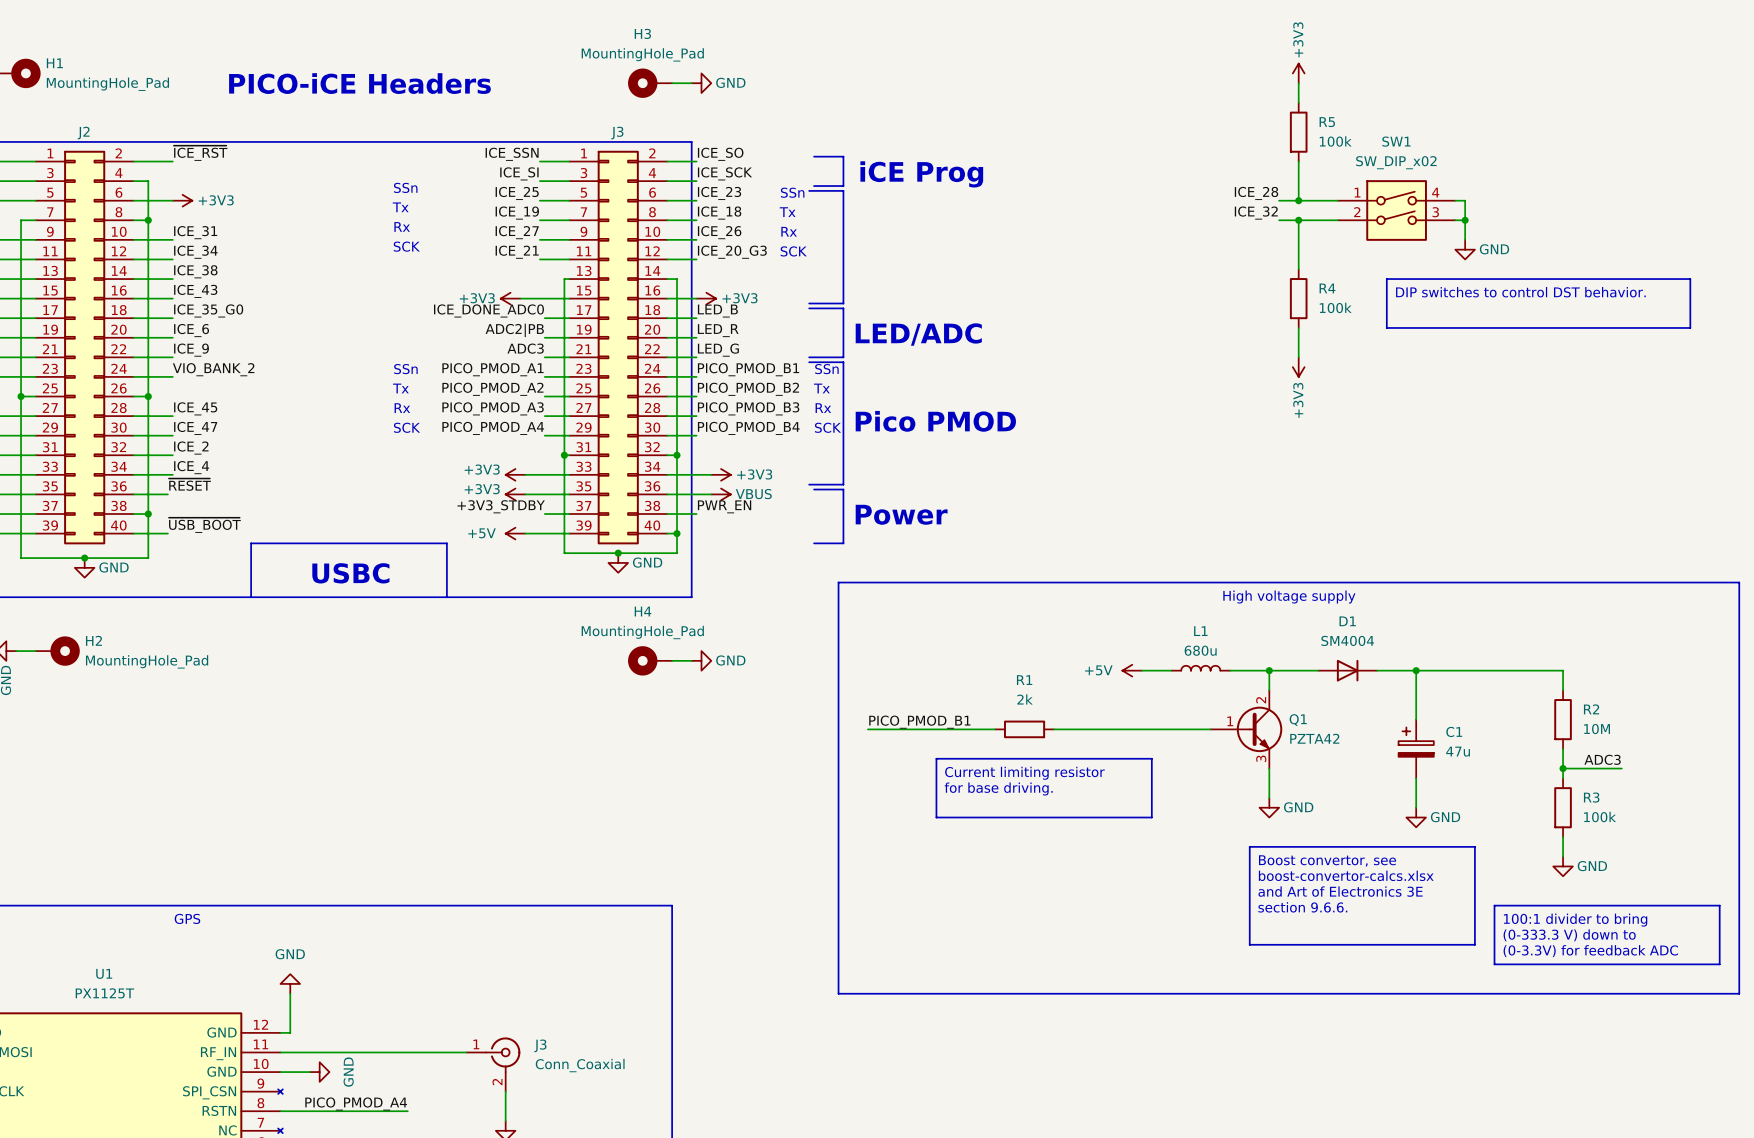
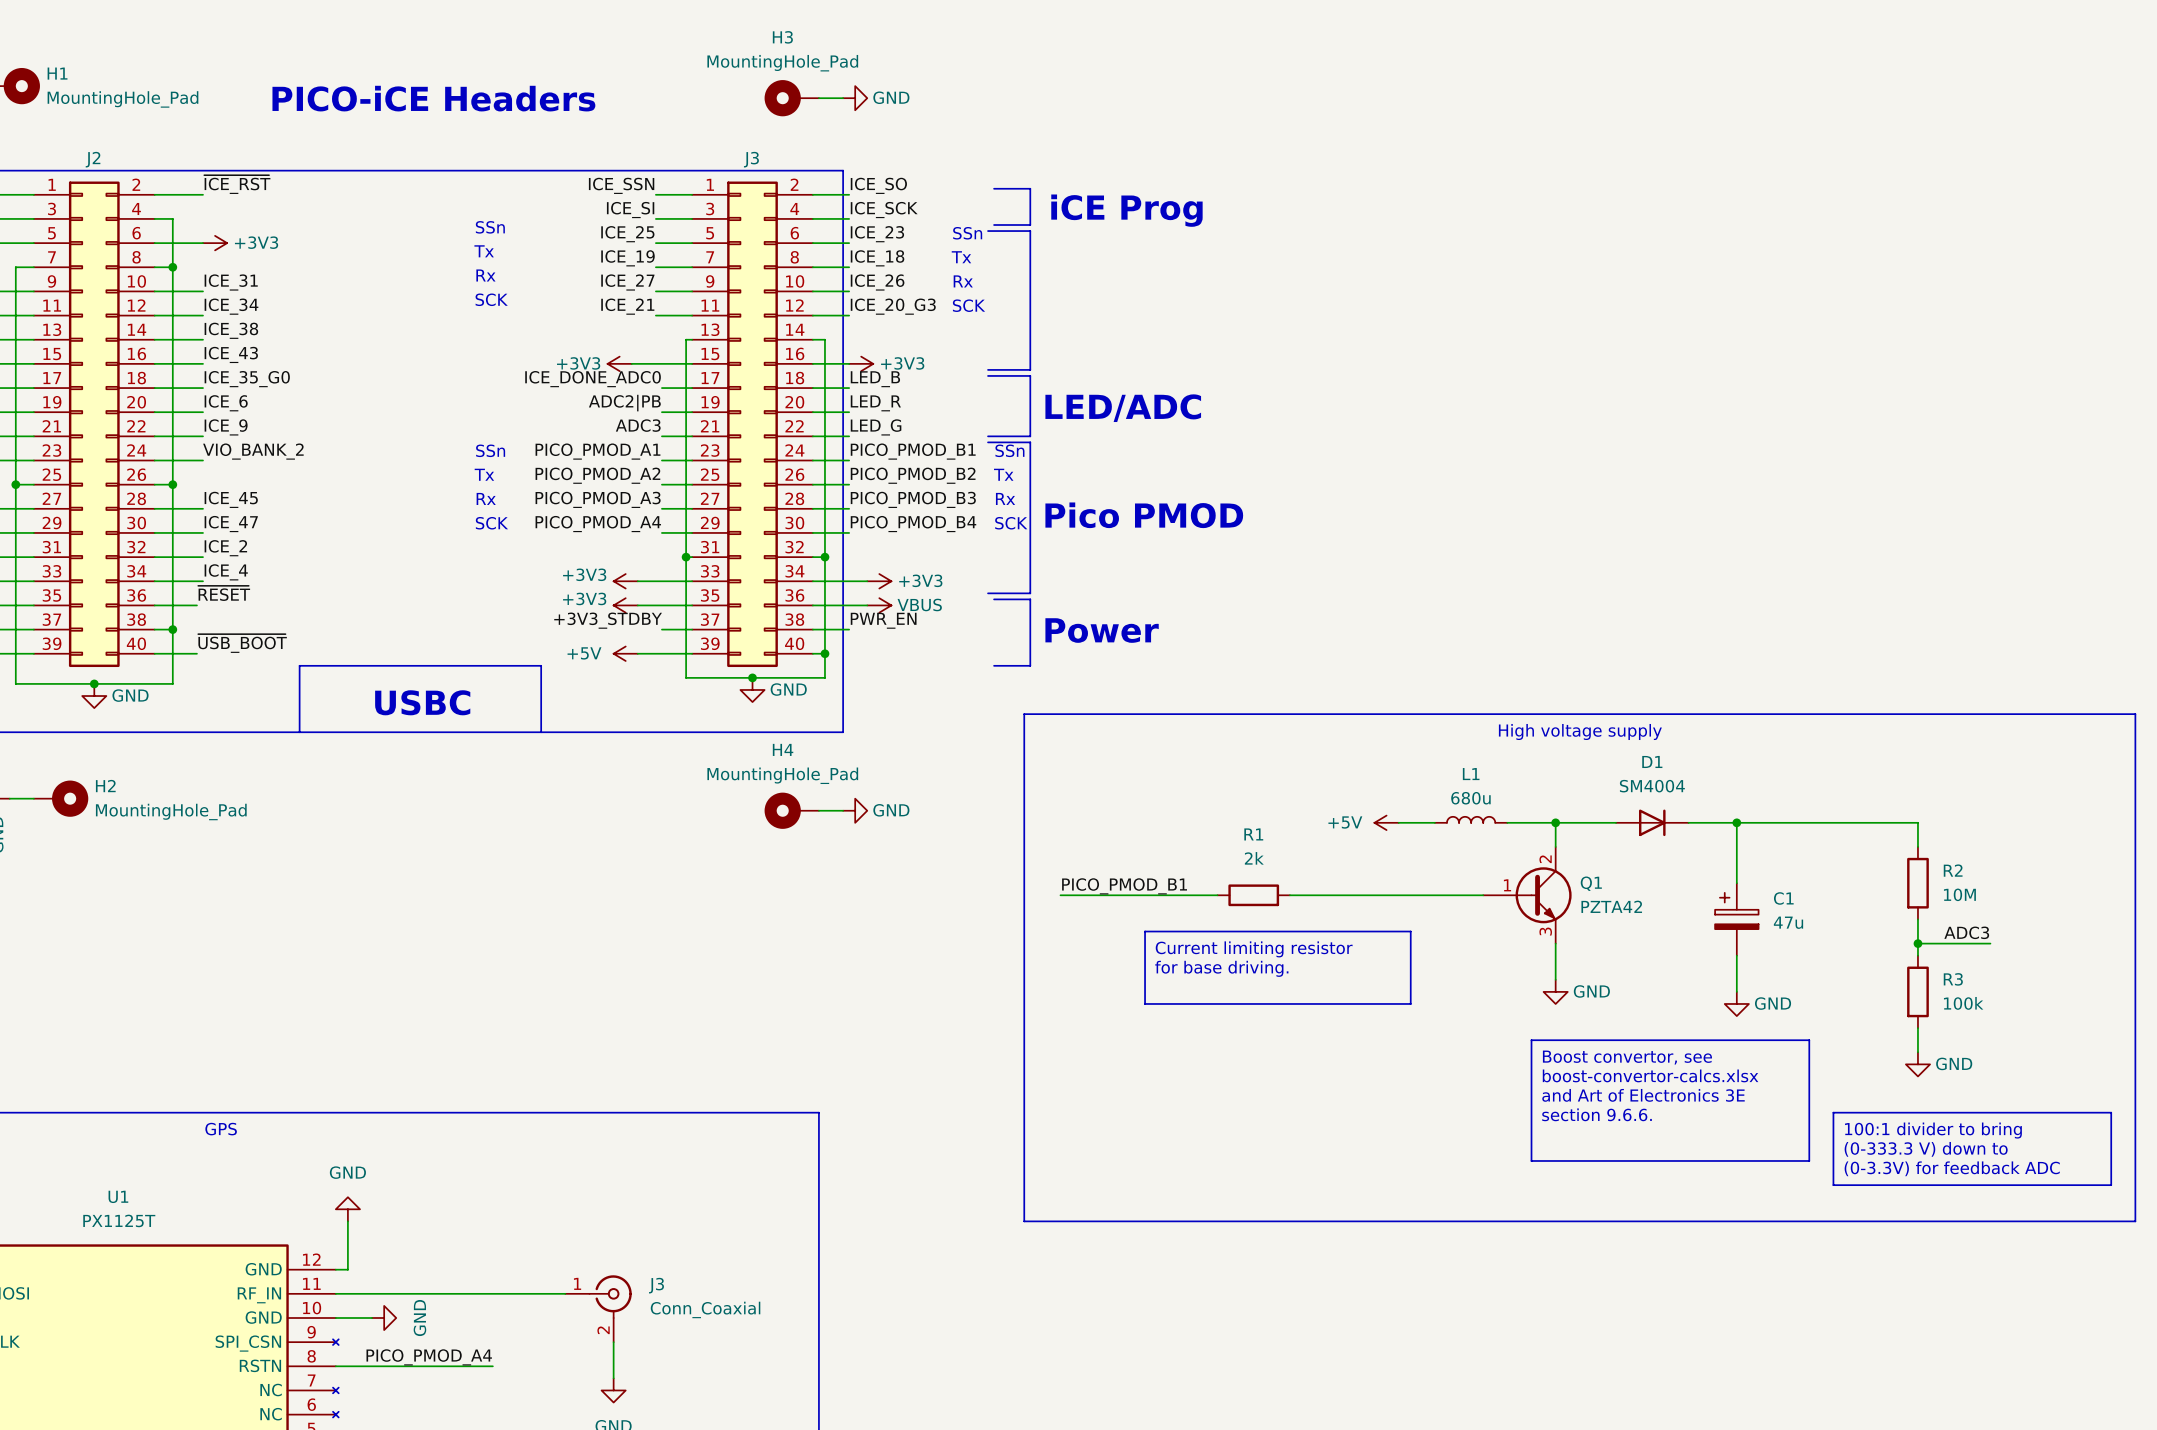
power symbol: +3V3 (1298, 73) -> none
wire: (1298, 83) (1298, 102) -> none
R5: 100k (1298, 132) -> none
wire: (1298, 161) (1298, 200) -> none
label: ICE_28 (1256, 193) -> none
wire: (1279, 200) (1337, 200) -> none
junction: (1298, 200) -> none
wire: (1455, 200) (1465, 200) (1465, 239) -> none
SW1: SW_DIP_x02 (1396, 210) -> none
label: ICE_32 (1256, 213) -> none
wire: (1279, 220) (1337, 220) -> none
wire: (1298, 220) (1298, 269) -> none
junction: (1298, 220) -> none
wire: (1455, 220) (1465, 220) -> none
junction: (1465, 220) -> none
power symbol: GND (1465, 249) -> none
line: (1386, 279) (1690, 279) (1690, 327) (1386, 327) (1386, 279) -> none
text: DIP switches to control DST behavior. (1520, 292) -> none
R4: 100k (1298, 298) -> none
wire: (1298, 327) (1298, 357) -> none
power symbol: +3V3 (1298, 367) -> none

